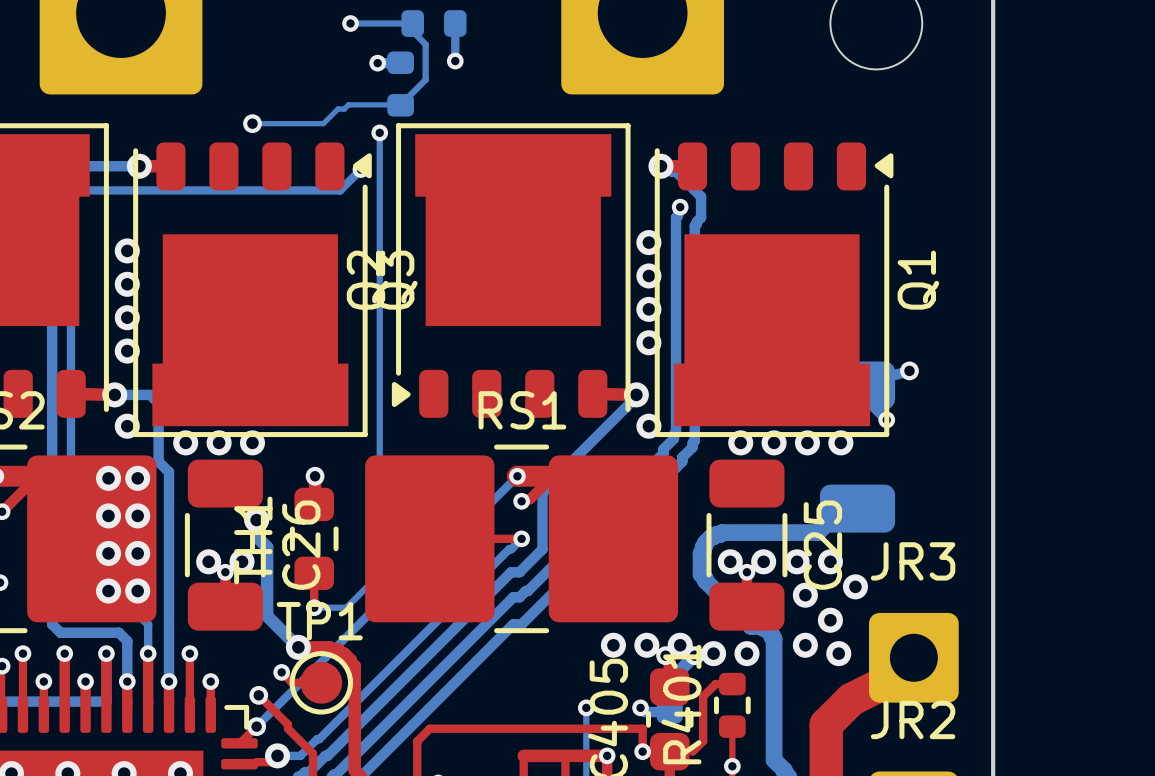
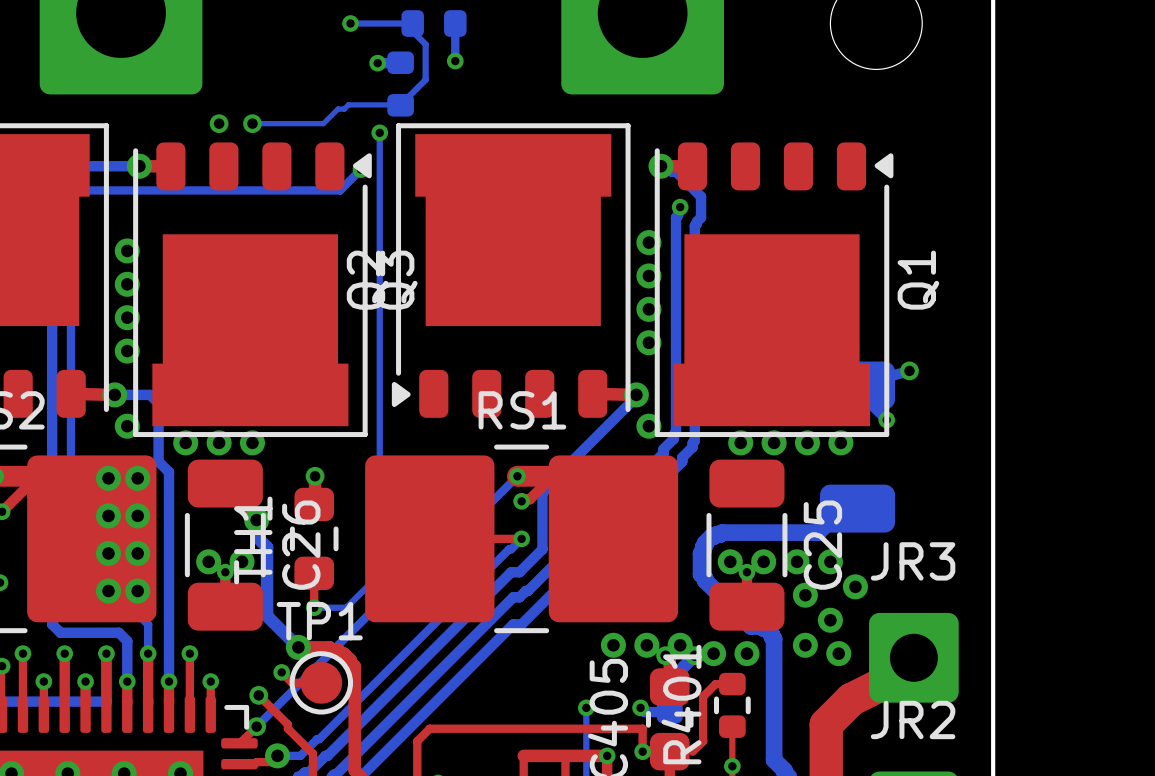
via: none -> (219, 123)

